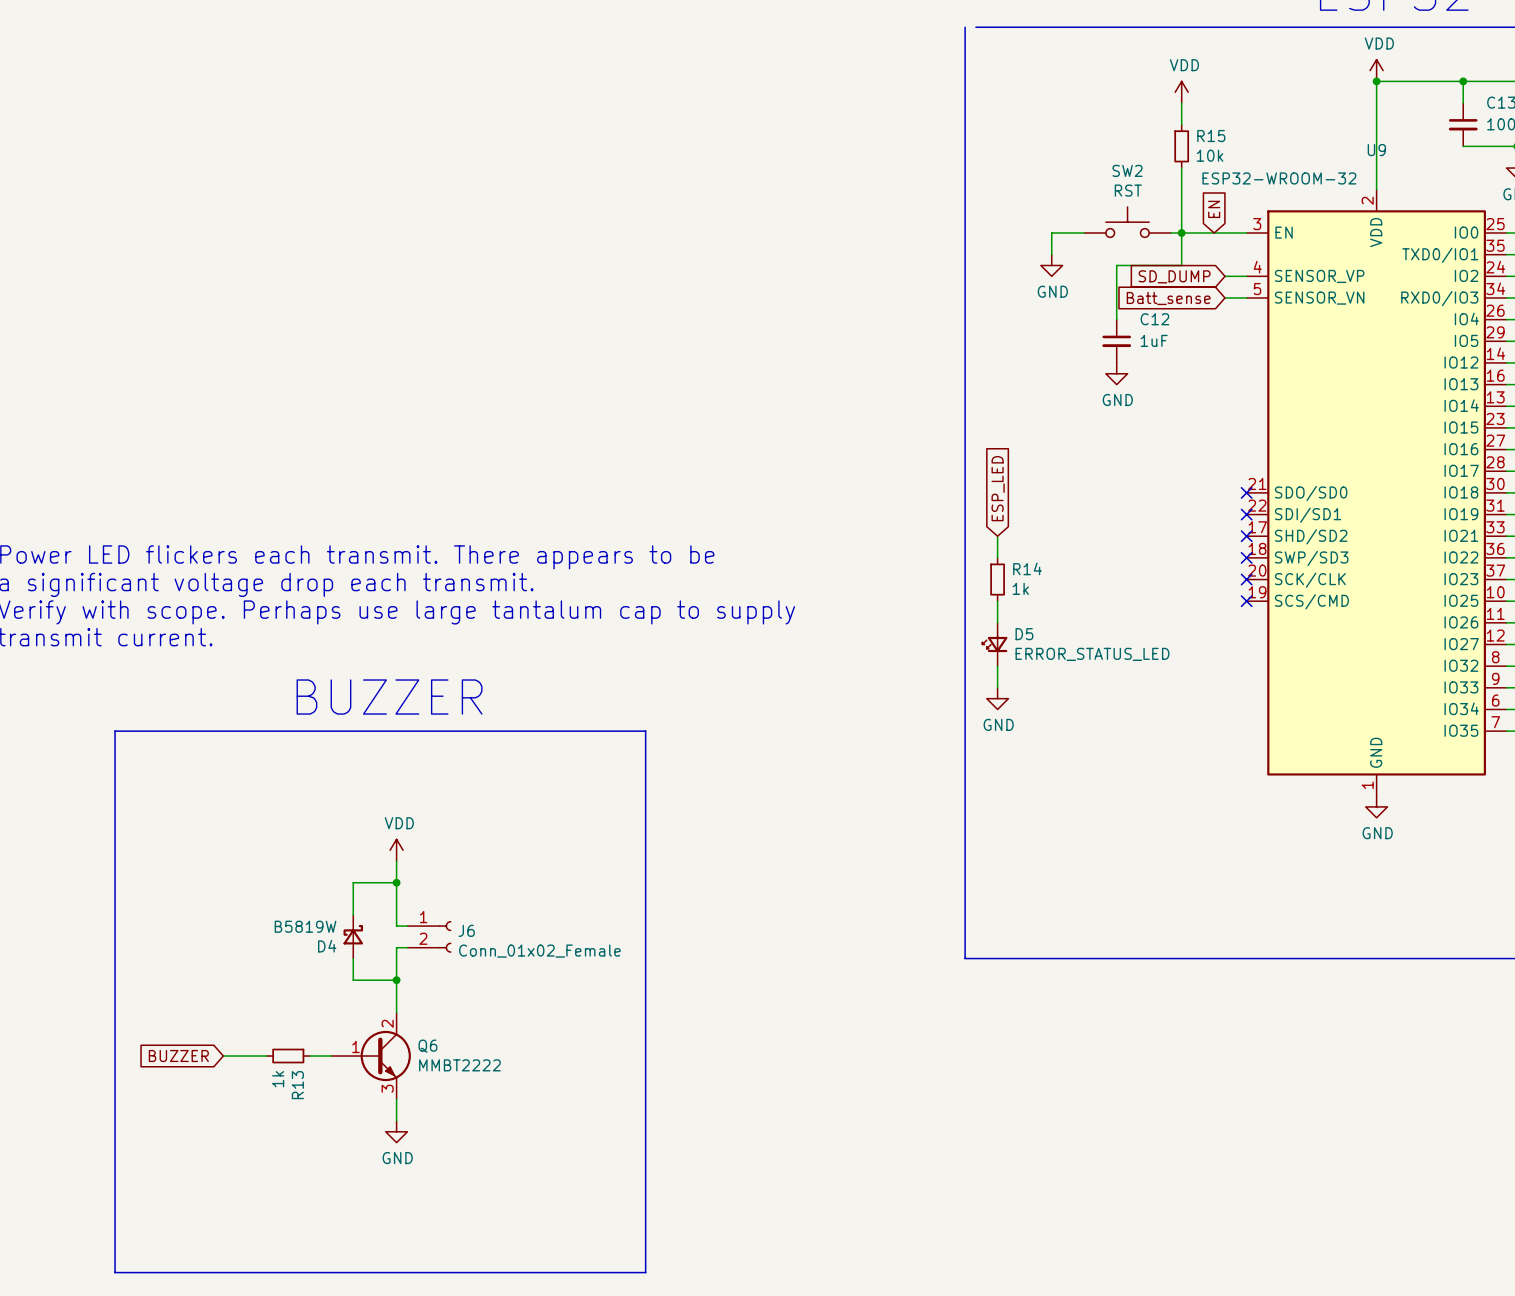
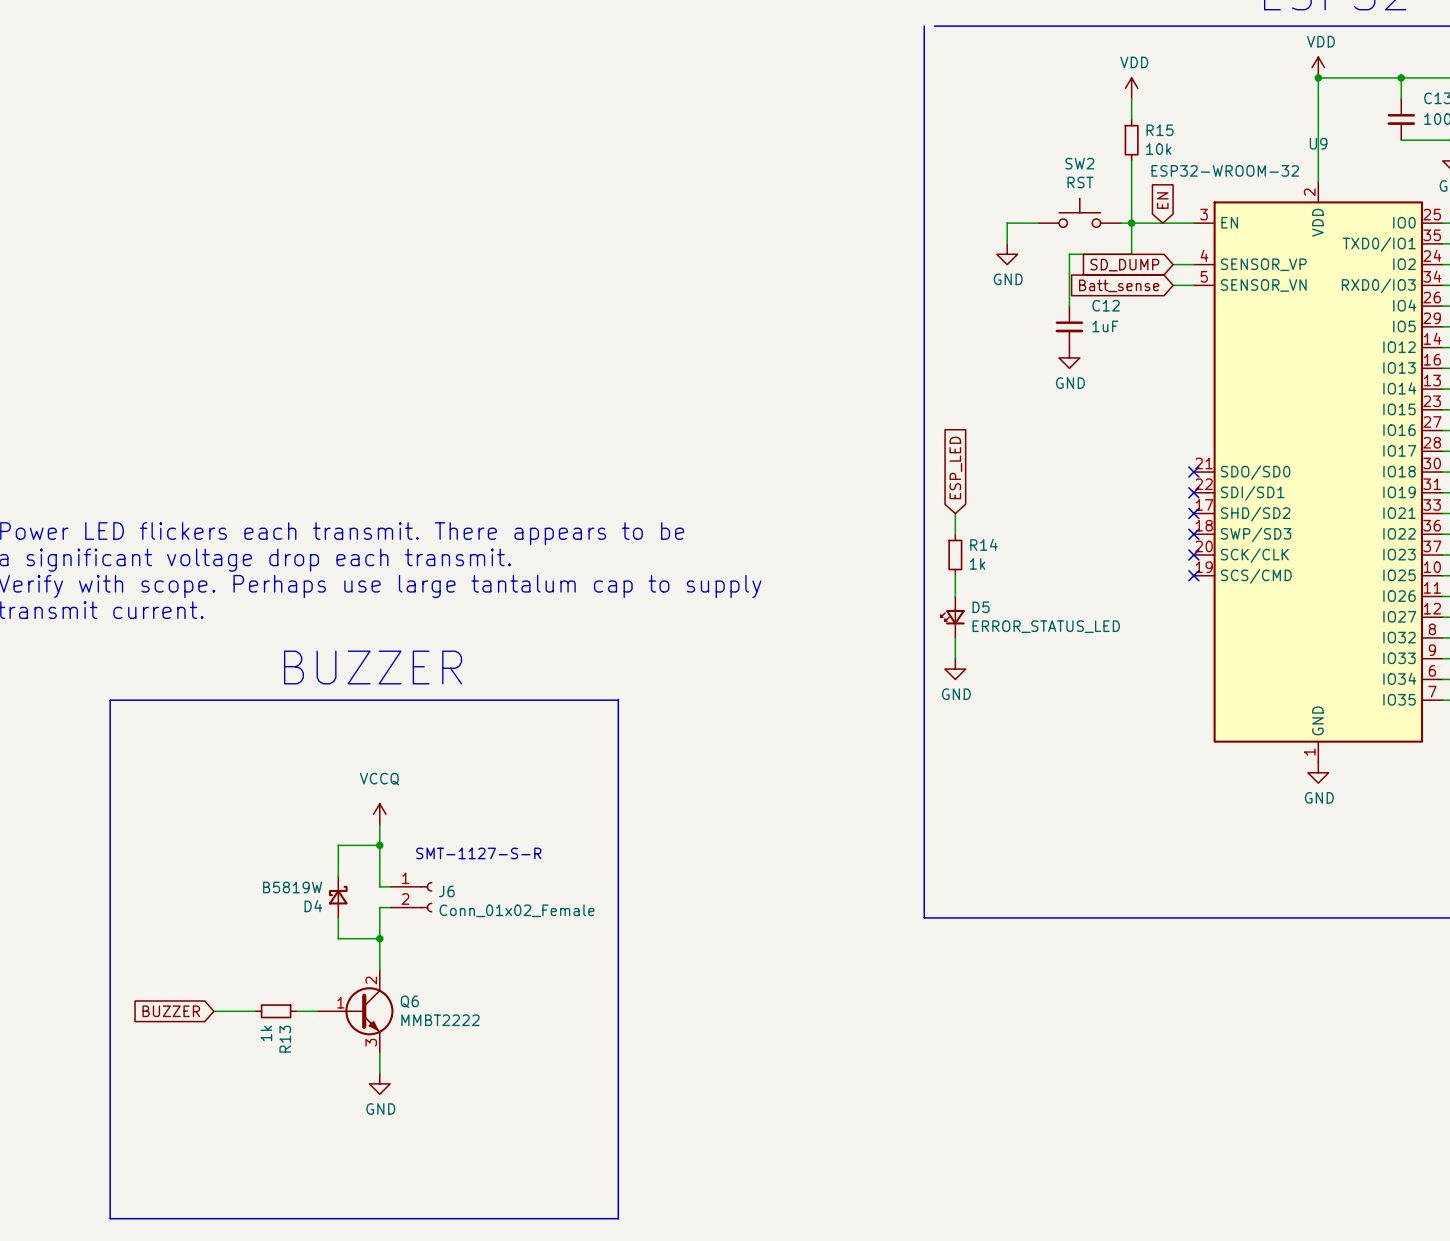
power symbol: VDD (396, 850) -> VCCQ (379, 814)
text: none -> SMT-1127-S-R (478, 853)

